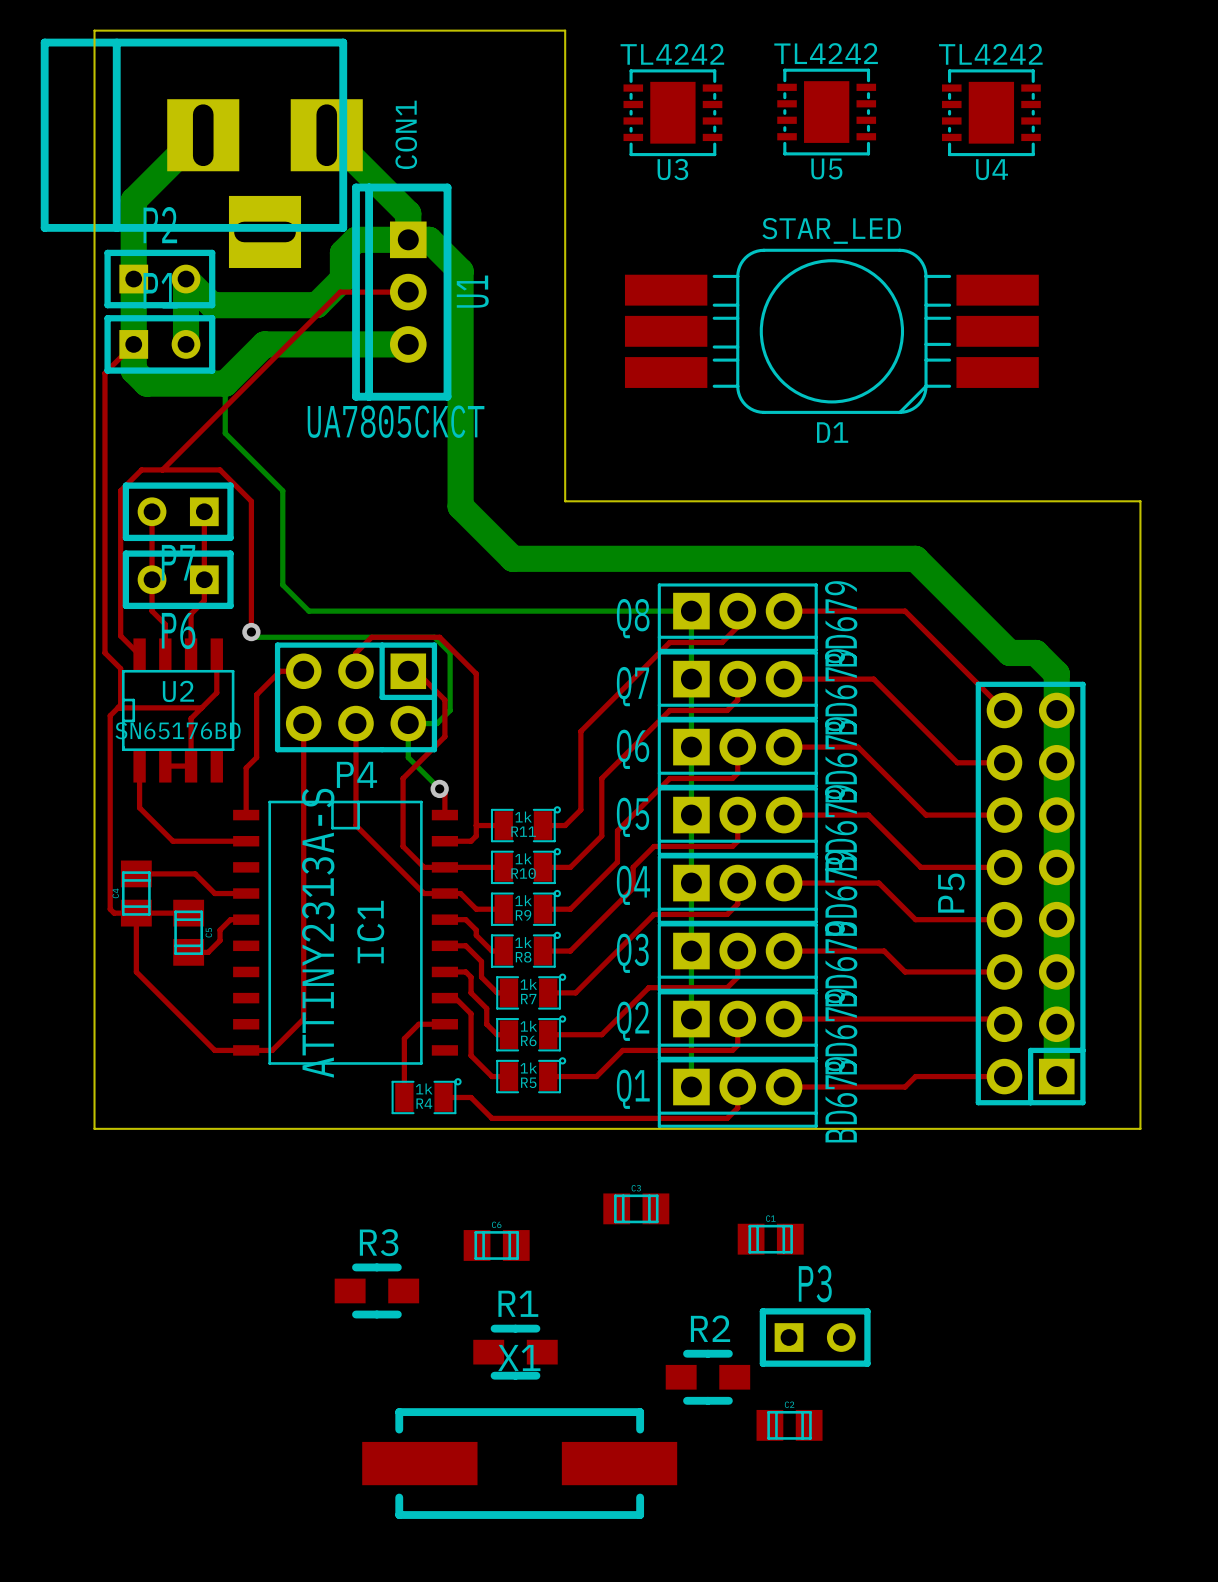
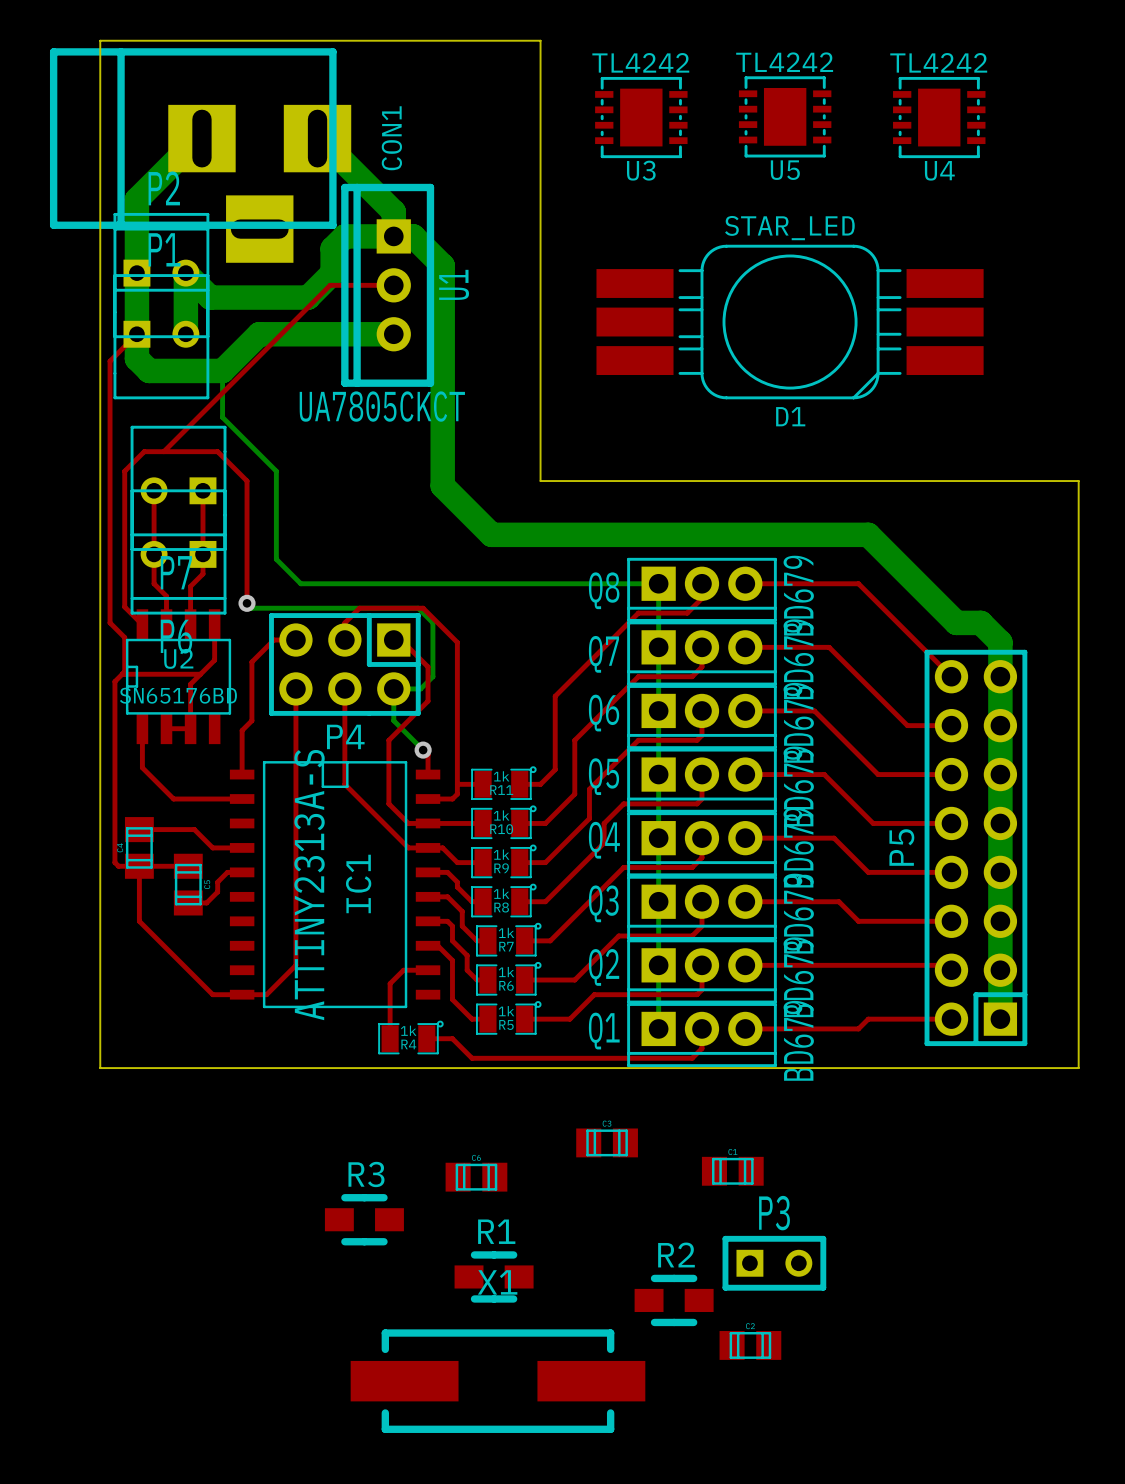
P2 footprint: [104, 249, 216, 309] -> [113, 212, 210, 339]
P1 footprint: [104, 315, 216, 374] -> [113, 274, 210, 400]
P7 footprint: [122, 482, 234, 542] -> [130, 425, 227, 551]
P6 footprint: [122, 550, 234, 610] -> [130, 489, 227, 615]

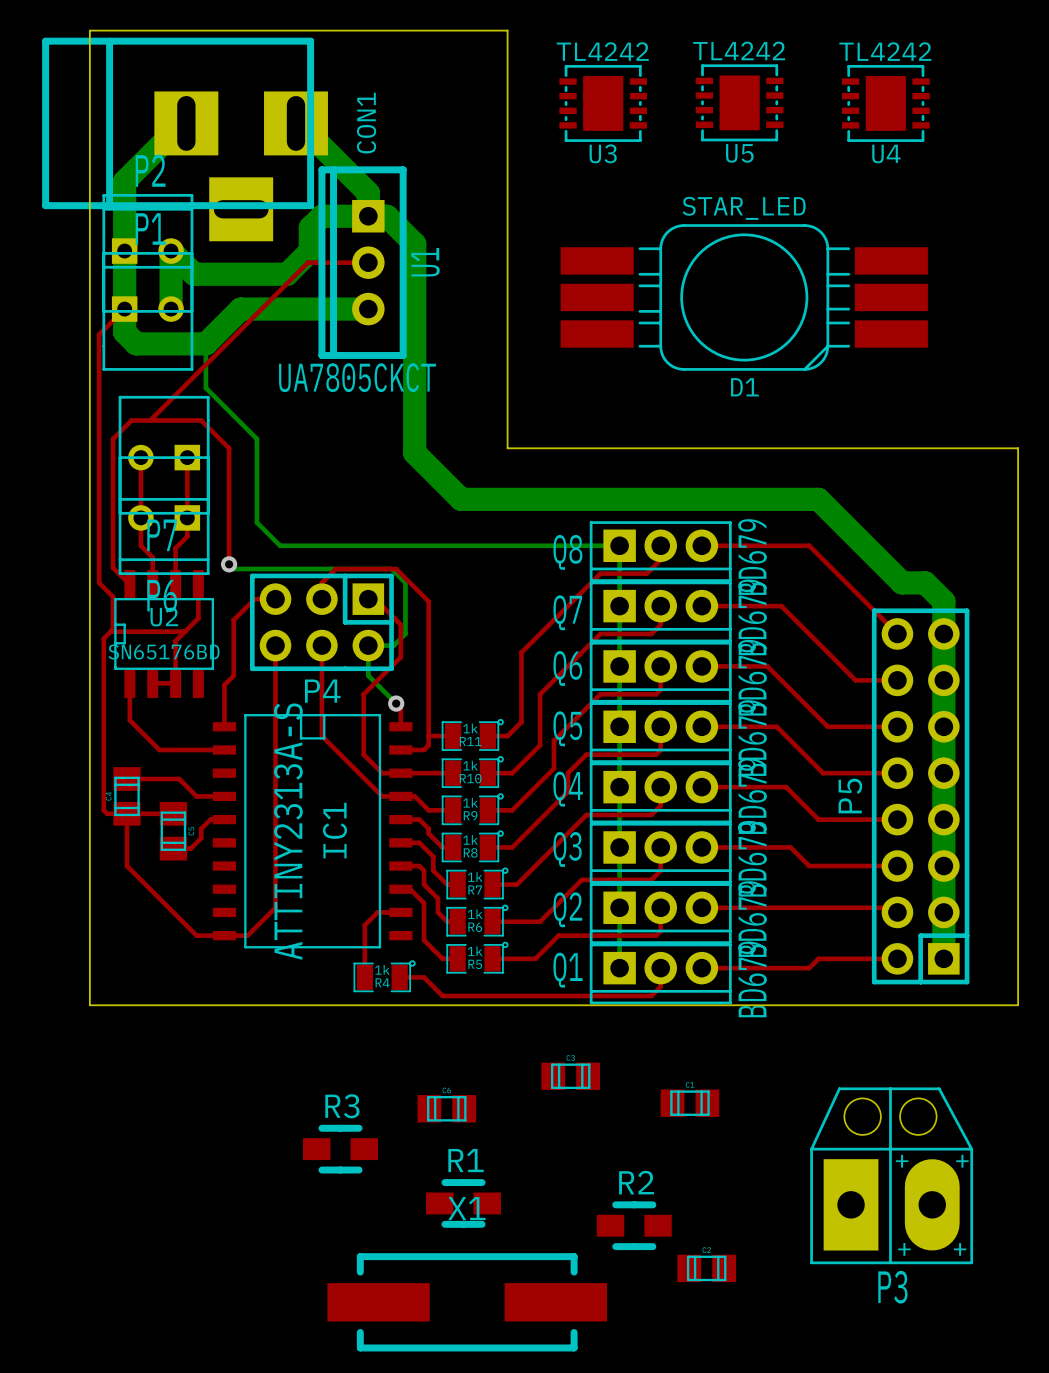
P3 name position: P3 (774, 1213) -> P3 (892, 1287)
P3 footprint: [722, 1235, 827, 1291] -> [810, 1087, 974, 1265]

